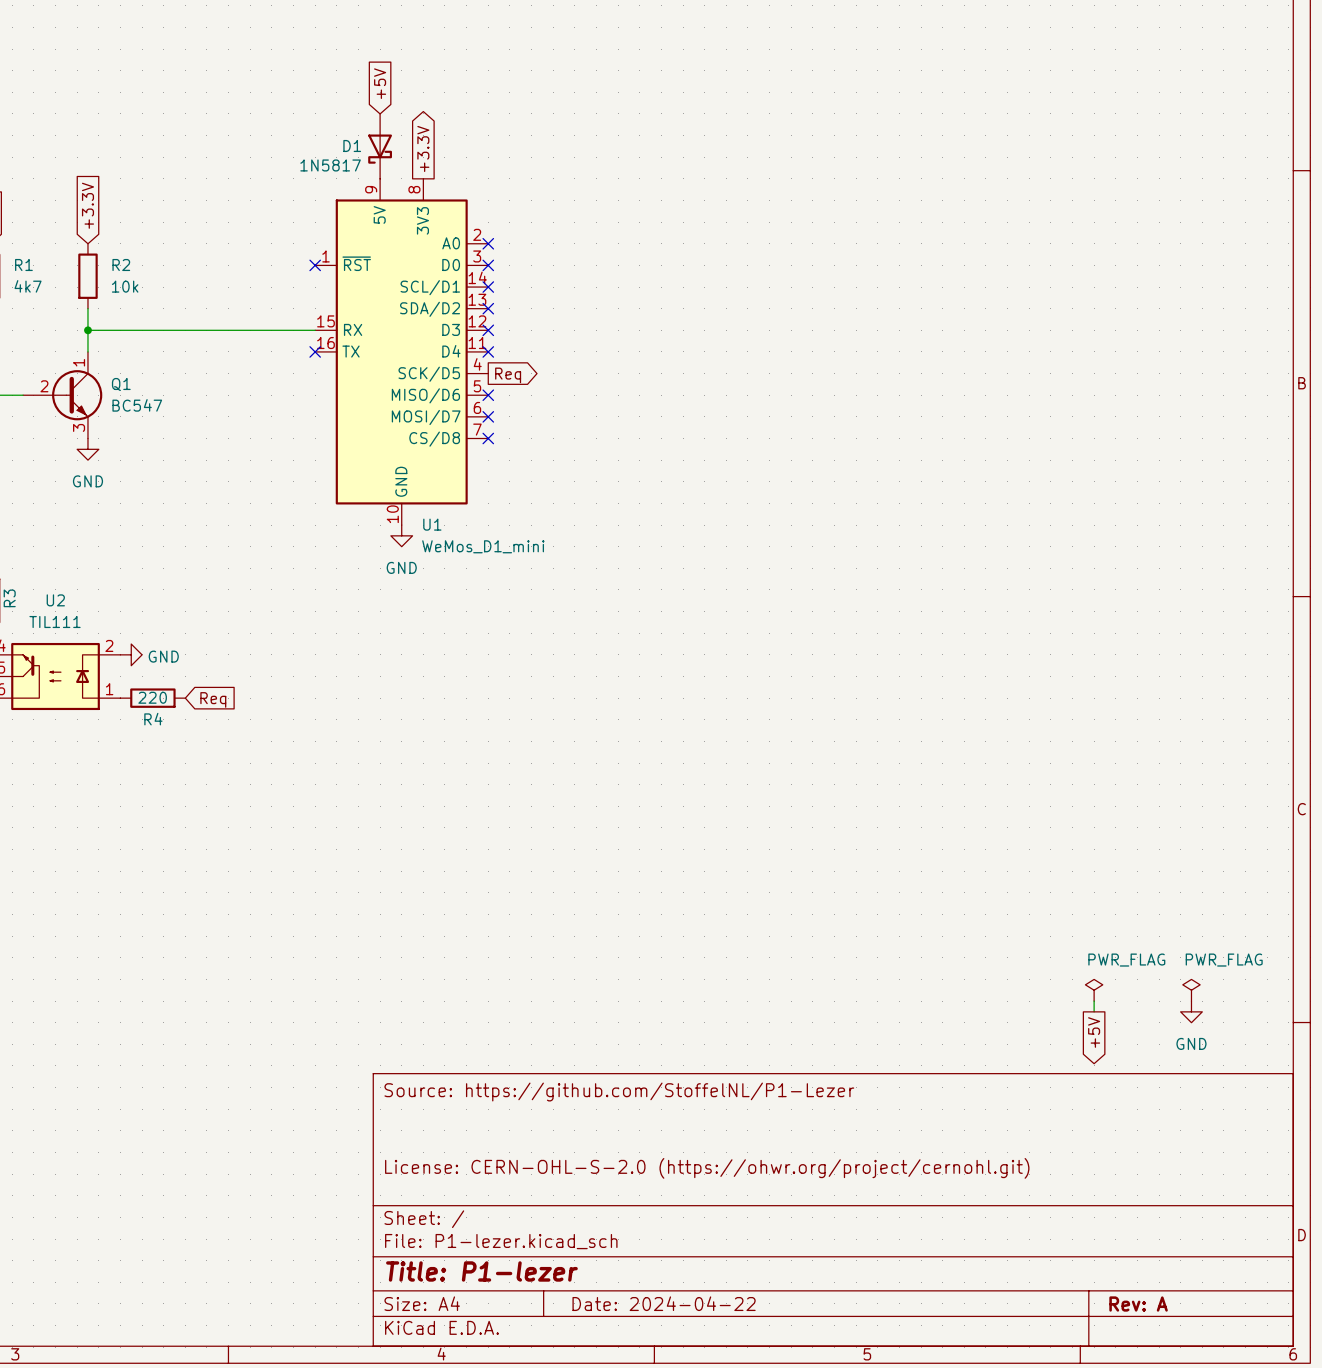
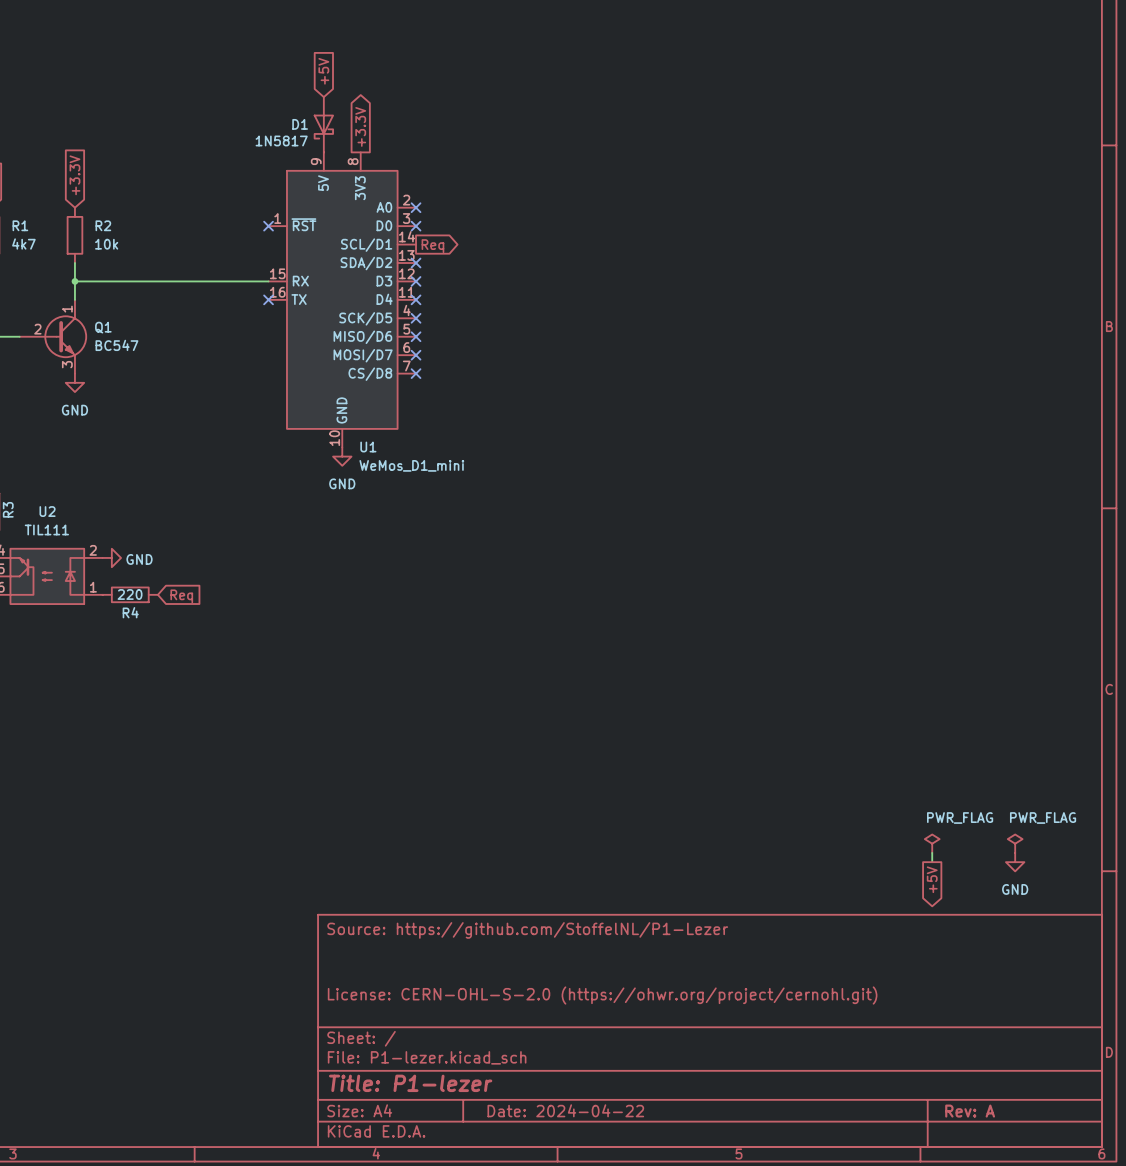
no-connect mark: (488, 287) -> none
no-connect mark: none -> (416, 318)
global label position: Req (508, 375) -> Req (432, 246)

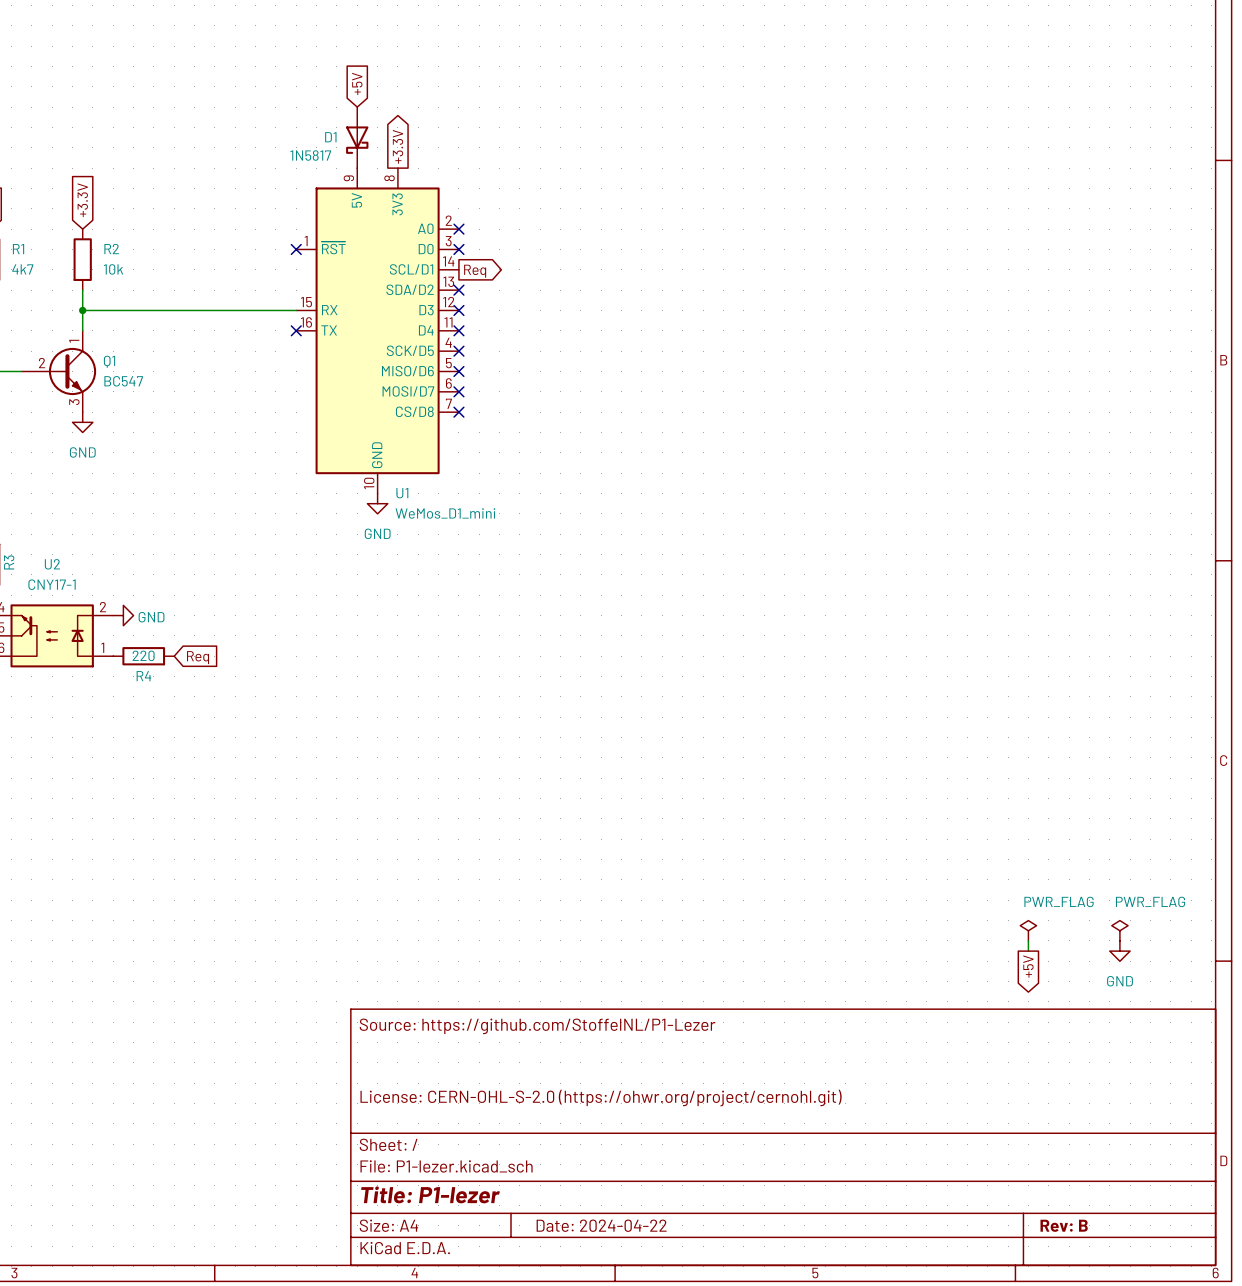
U2 value: TIL111 (46, 529) -> CNY17-1 (52, 584)
title block: Rev: A (970, 1111) -> Rev: B (1064, 1225)

